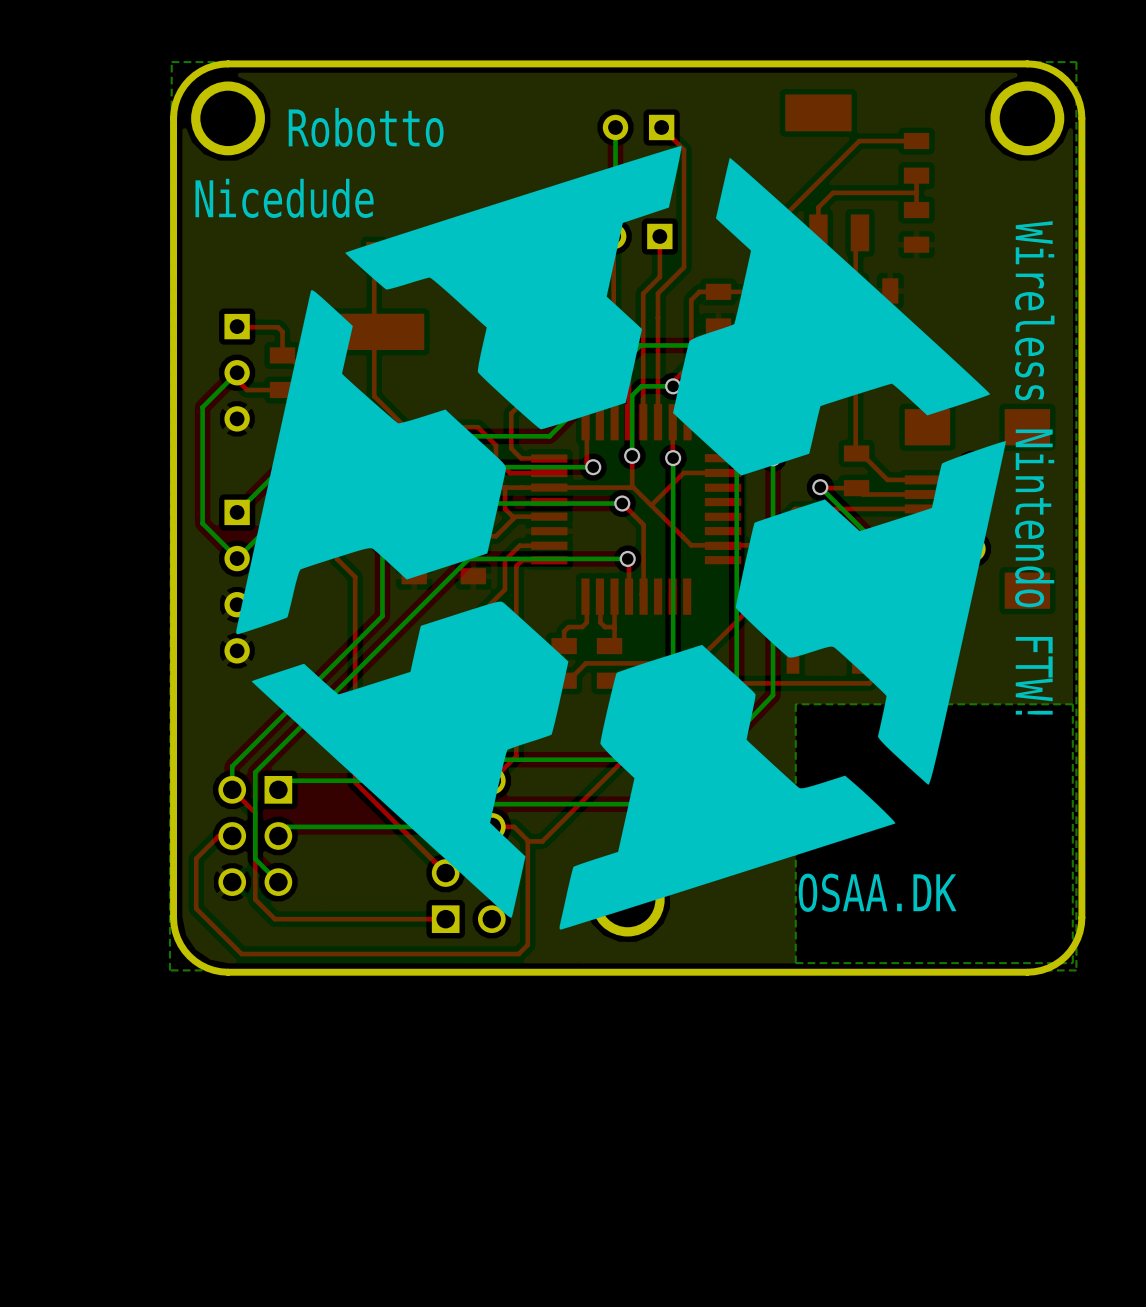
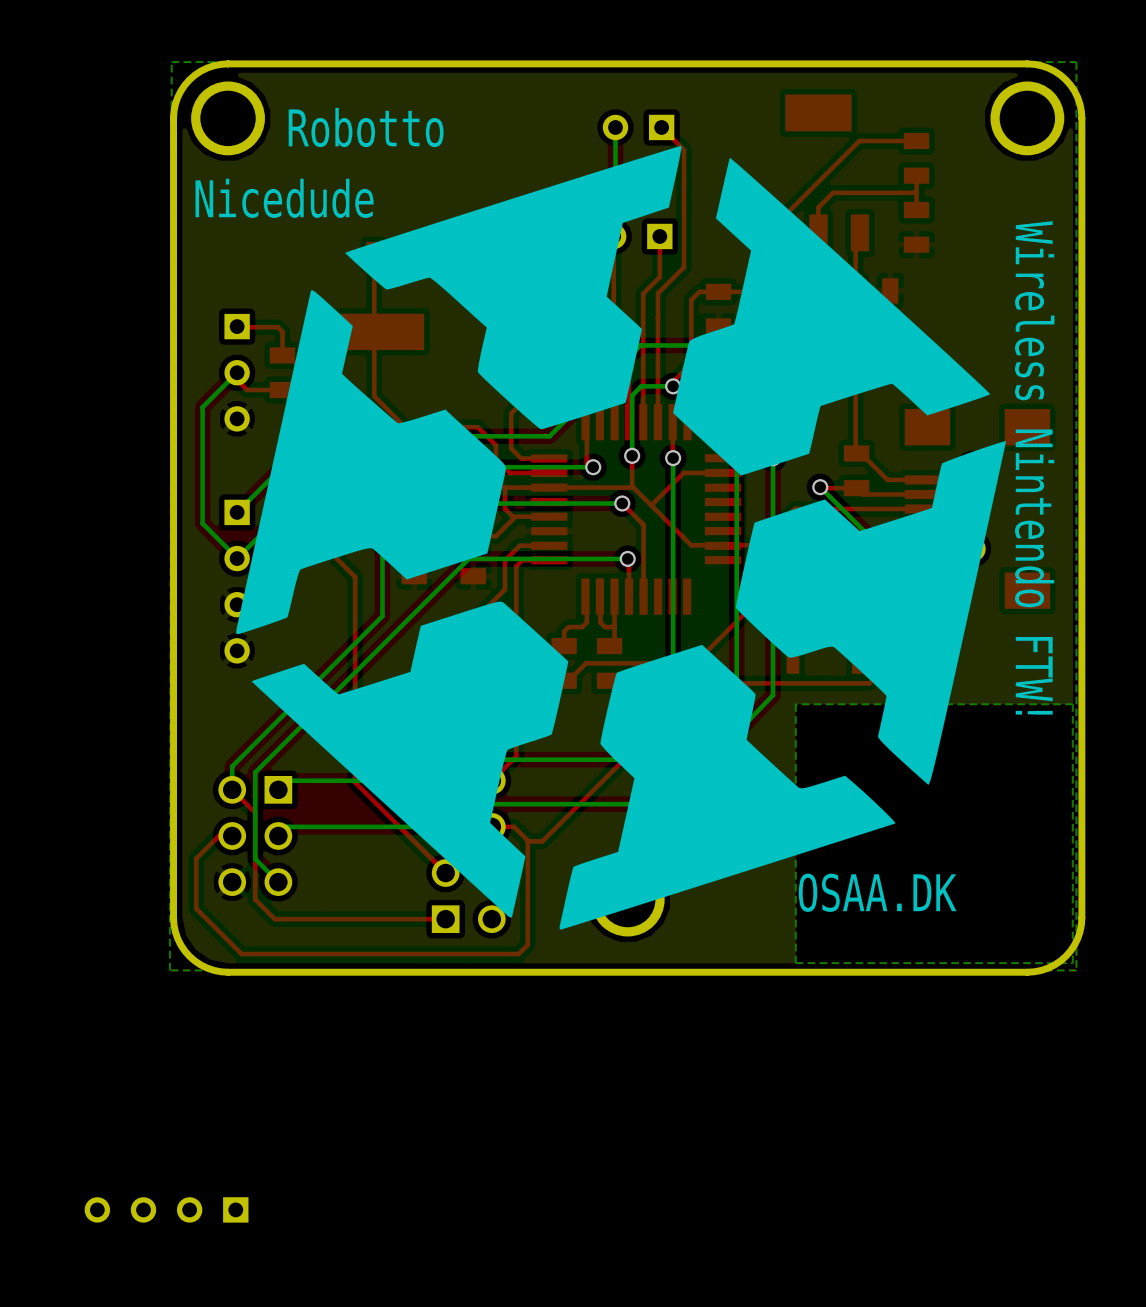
part: none -> (166, 1209)

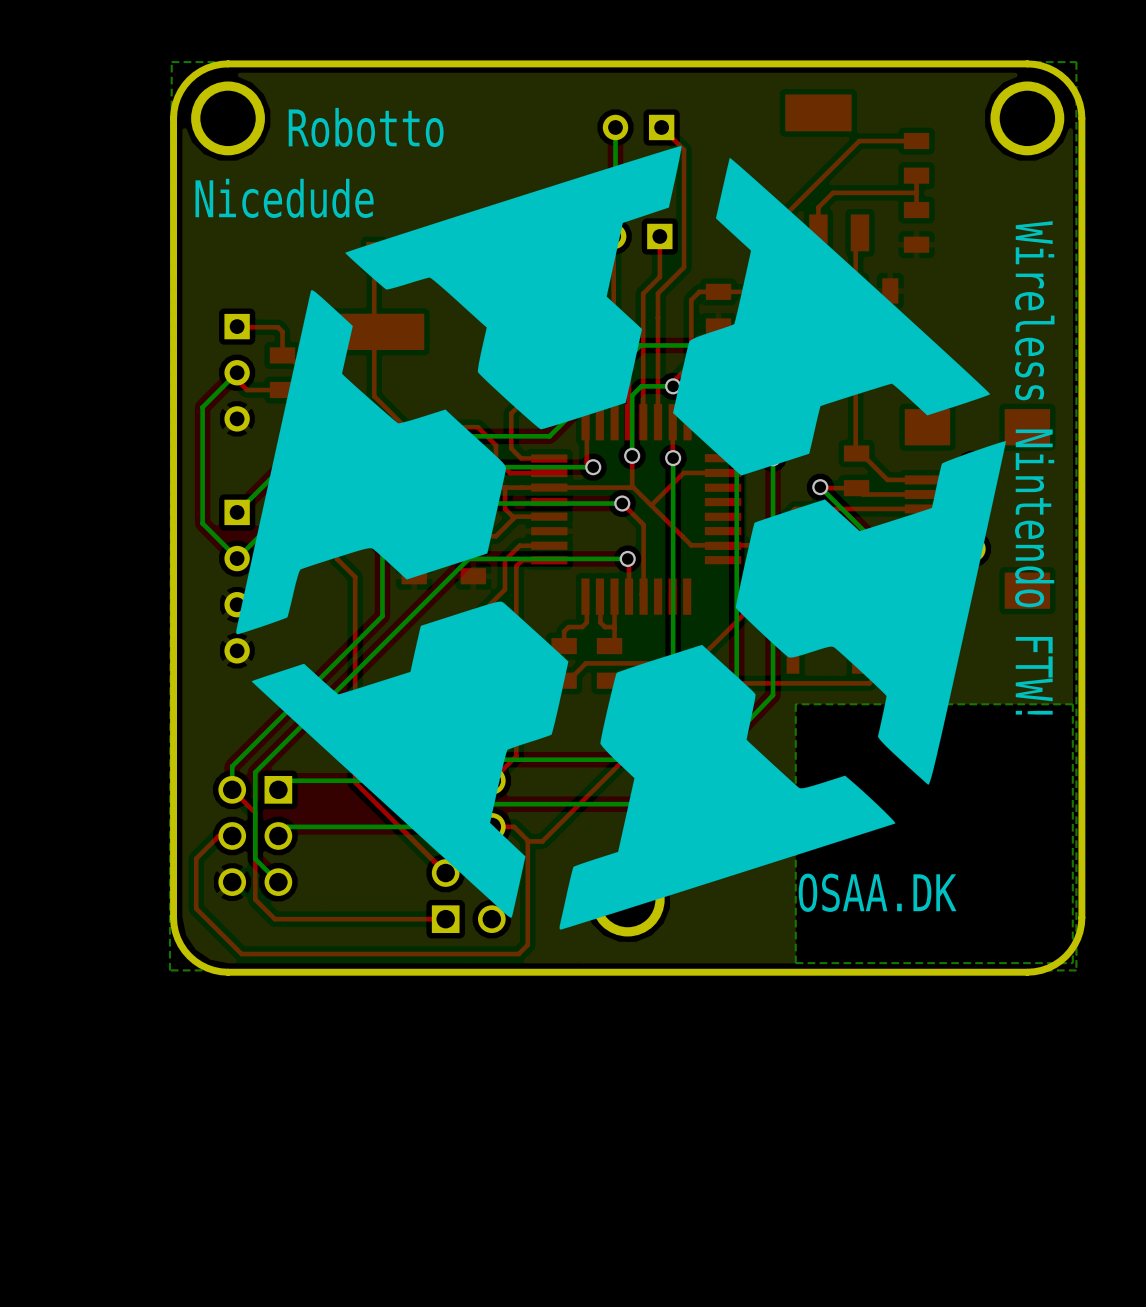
part: (166, 1209) -> none

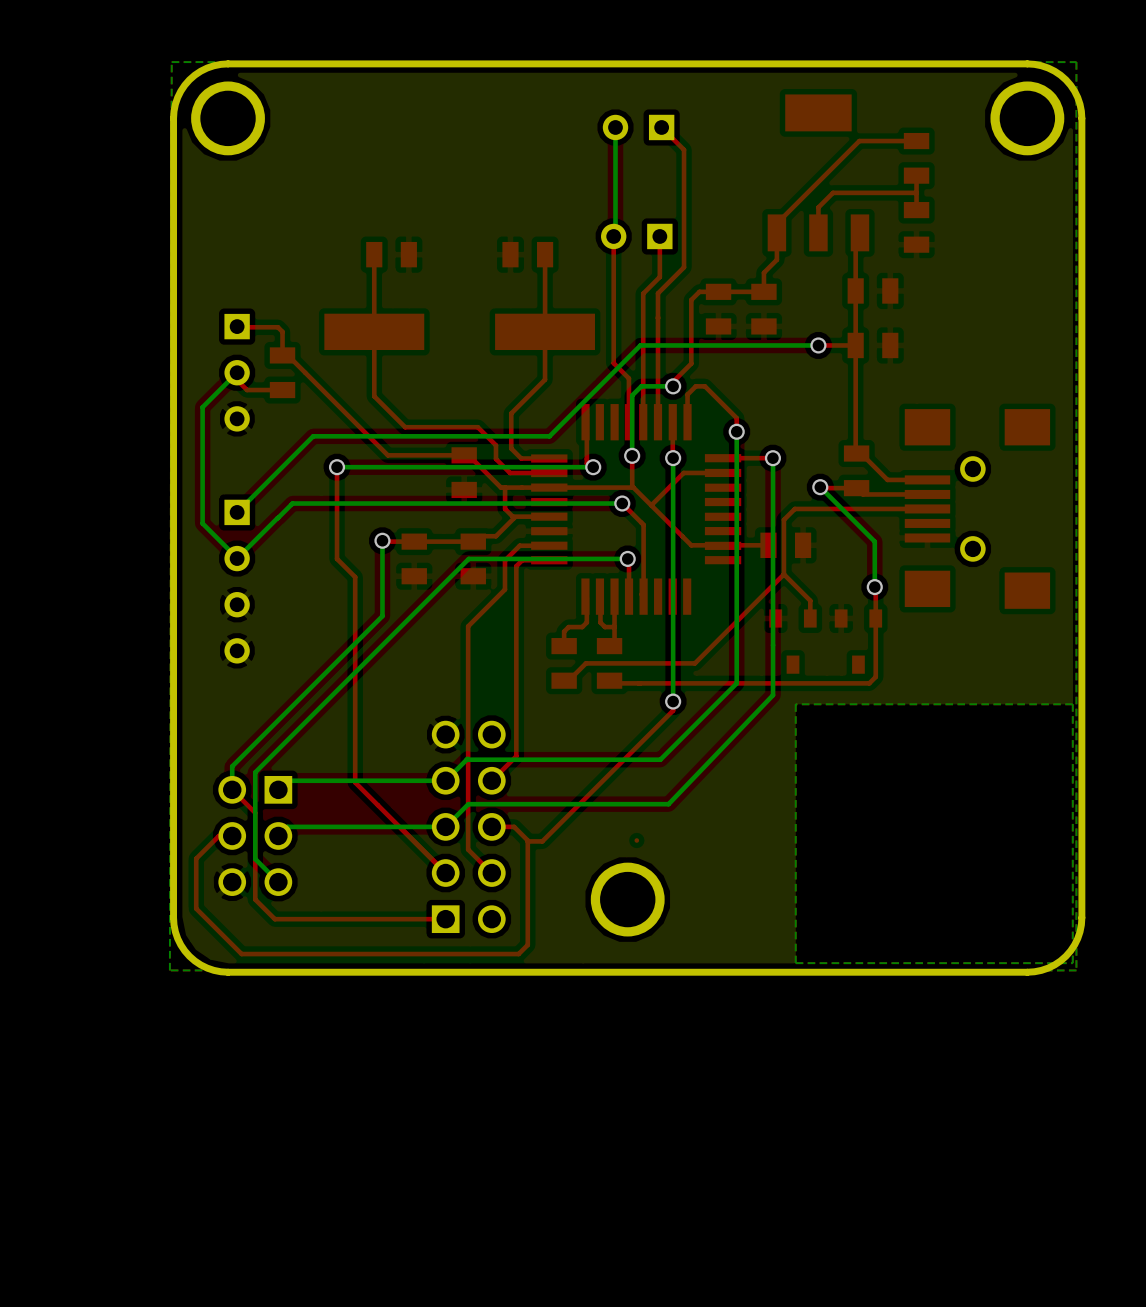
text: Robotto (366, 127) -> none
drawing: [236, 145, 1007, 930] -> none
text: Nicedude (284, 198) -> none
text: Wireless Nintendo FTW! (1034, 467) -> none
text: OSAA.DK (877, 892) -> none

